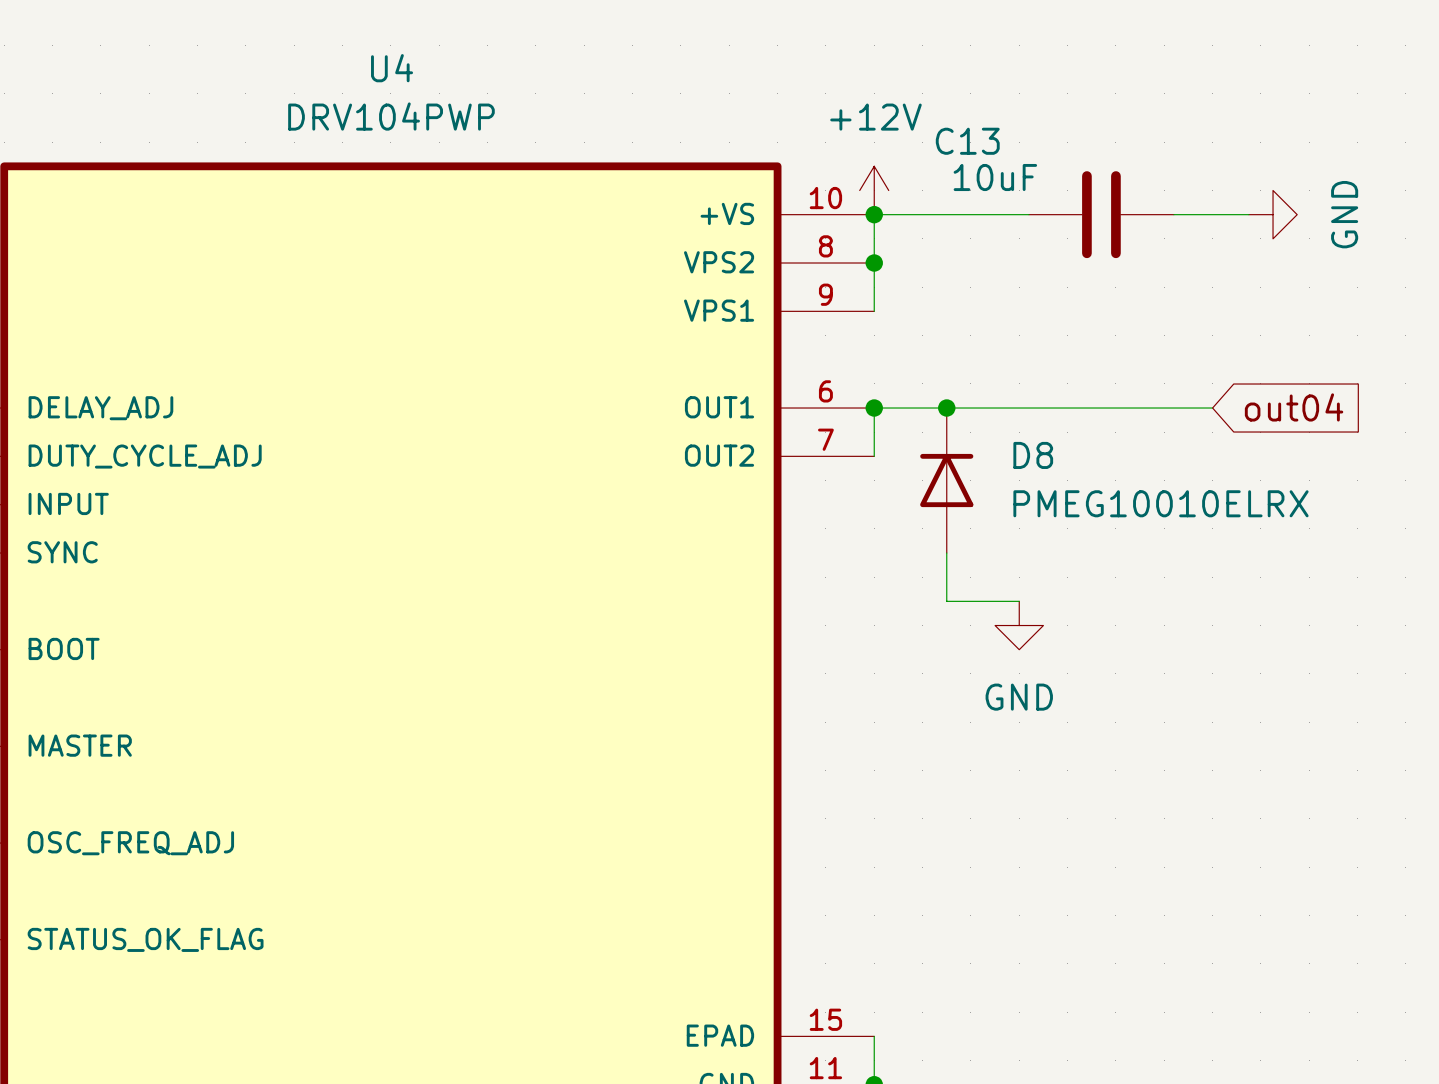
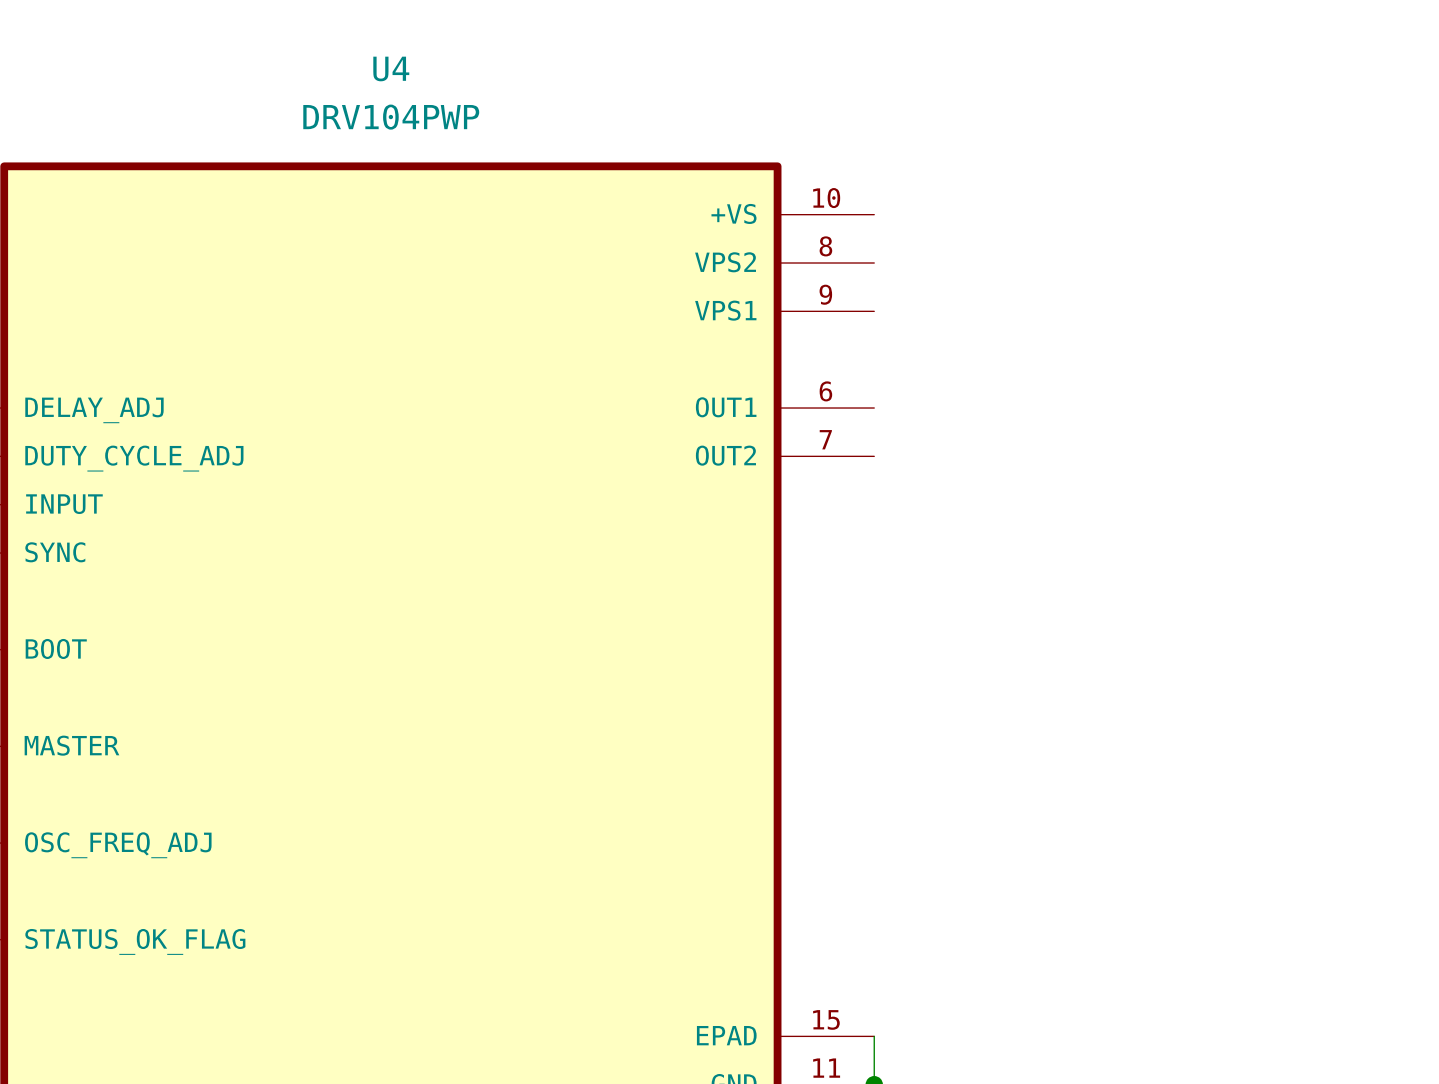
power symbol: +12V (874, 190) -> none
junction: (874, 214) -> none
wire: (1028, 214) (874, 214) (874, 311) -> none
C13: 10uF (1101, 214) -> none
wire: (1173, 214) (1248, 214) -> none
power symbol: GND (1273, 214) -> none
junction: (874, 263) -> none
global label: out04 (1294, 407) -> none
junction: (874, 408) -> none
junction: (946, 408) -> none
wire: (1212, 408) (874, 408) (874, 456) -> none
D8: PMEG10010ELRX (946, 480) -> none
wire: (946, 553) (946, 601) (1019, 601) -> none
power symbol: GND (1019, 625) -> none

